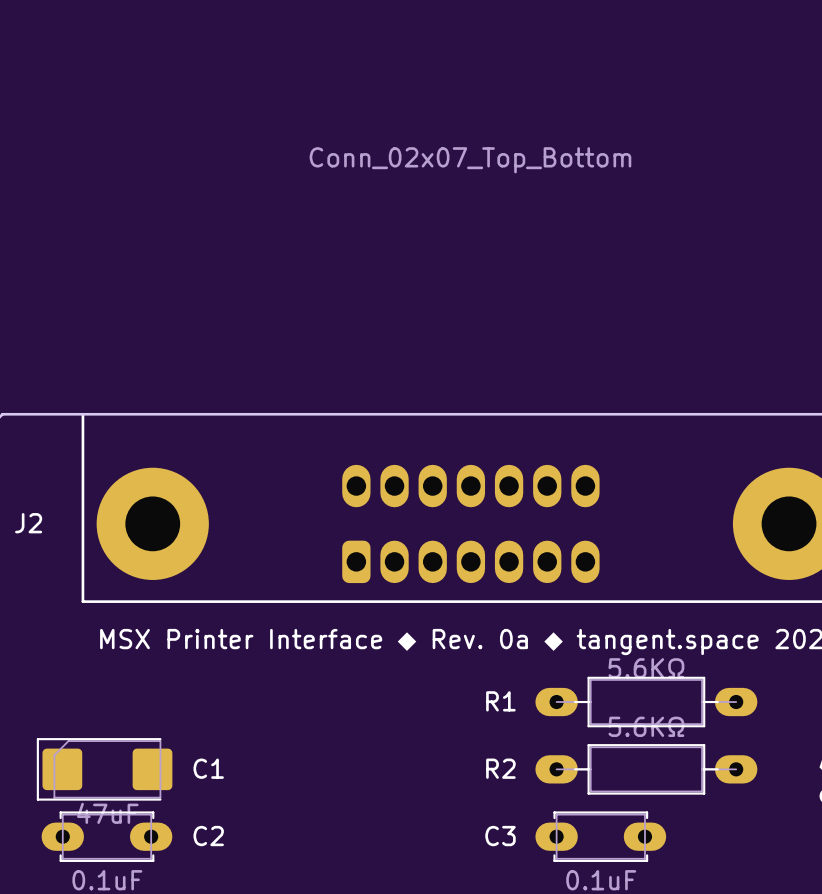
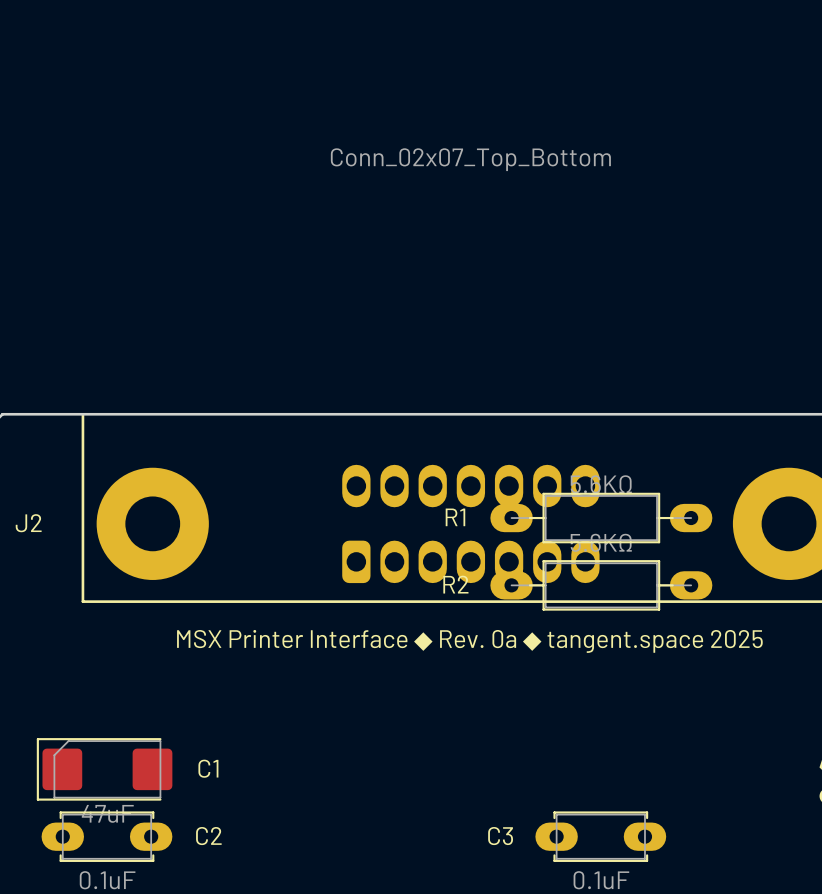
R1 footprint: [535, 676, 758, 728] -> [490, 492, 713, 544]
R2 footprint: [535, 744, 758, 795] -> [490, 560, 713, 611]

